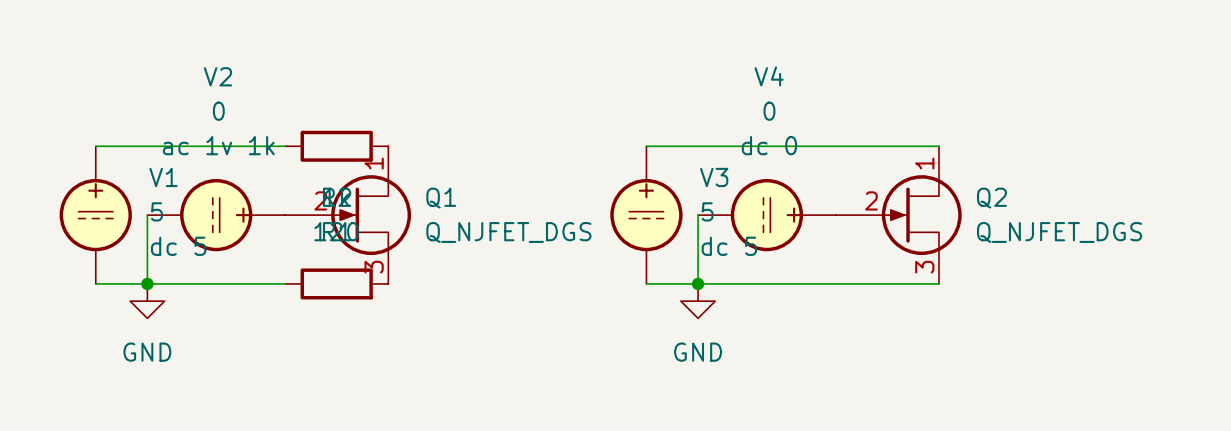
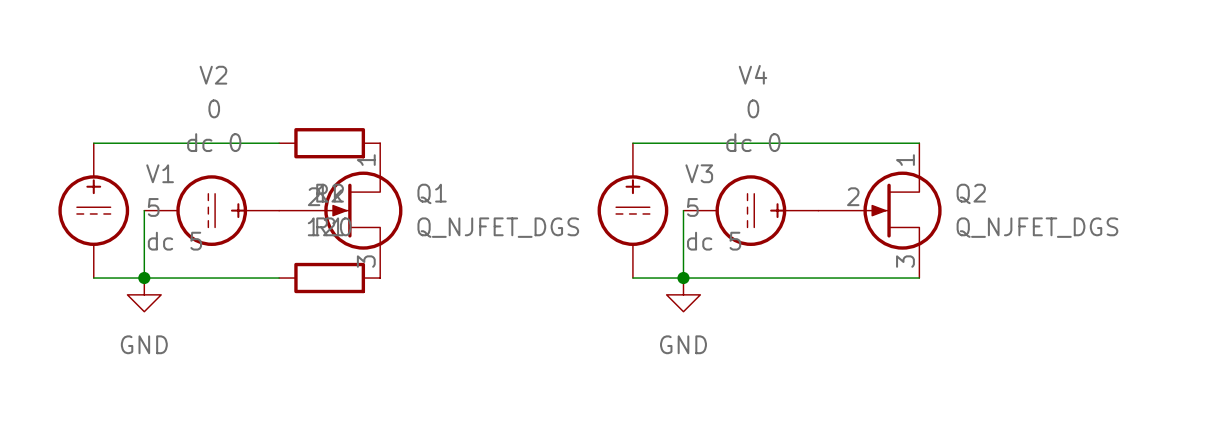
V2 text: ac 1v 1k (218, 145) -> dc 0 (214, 142)

